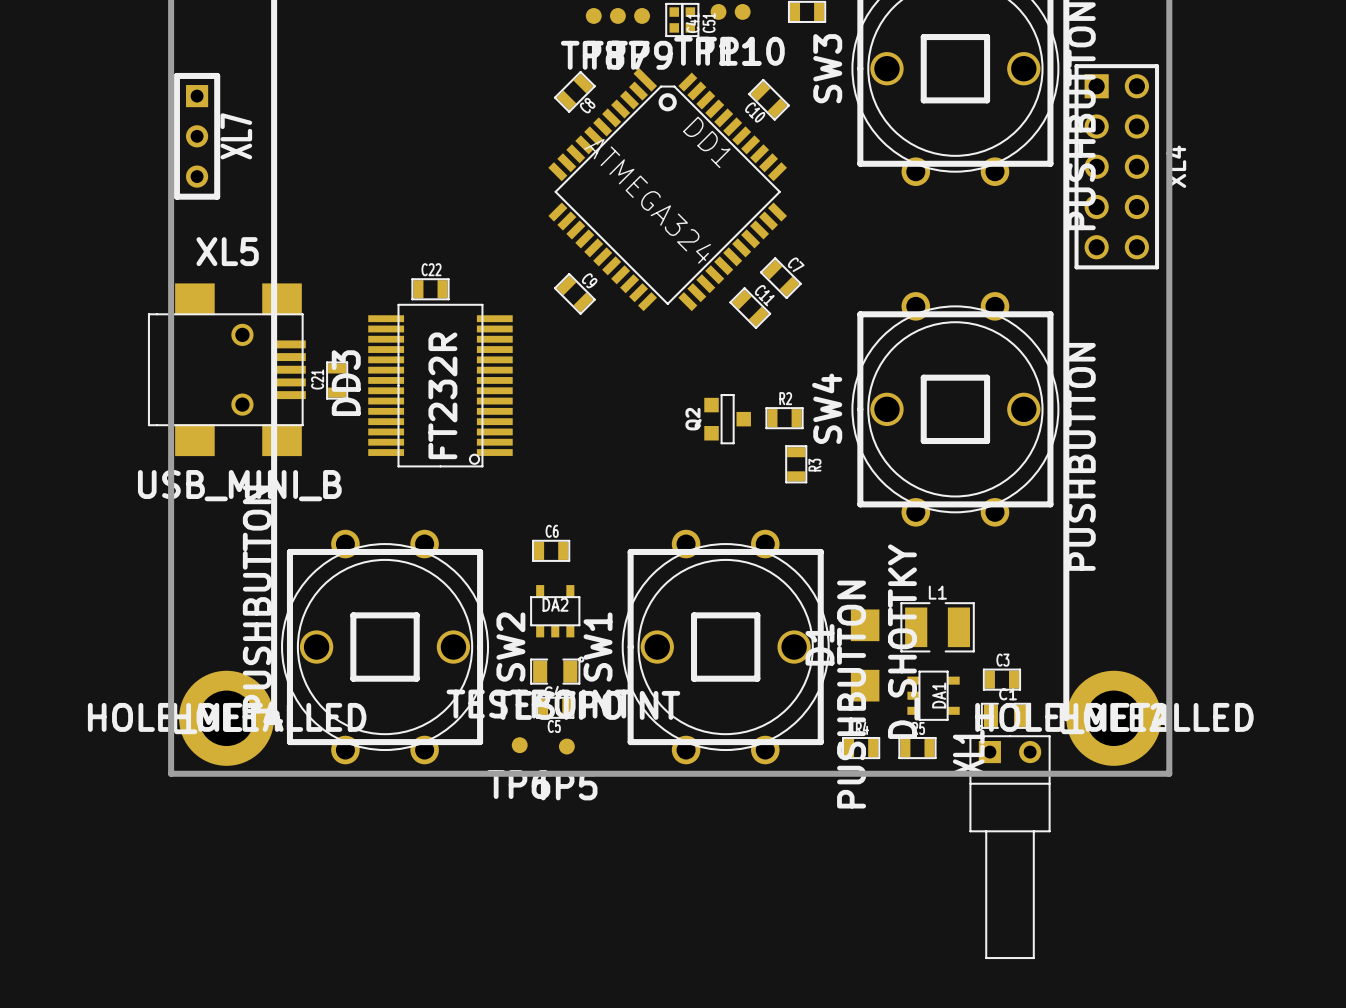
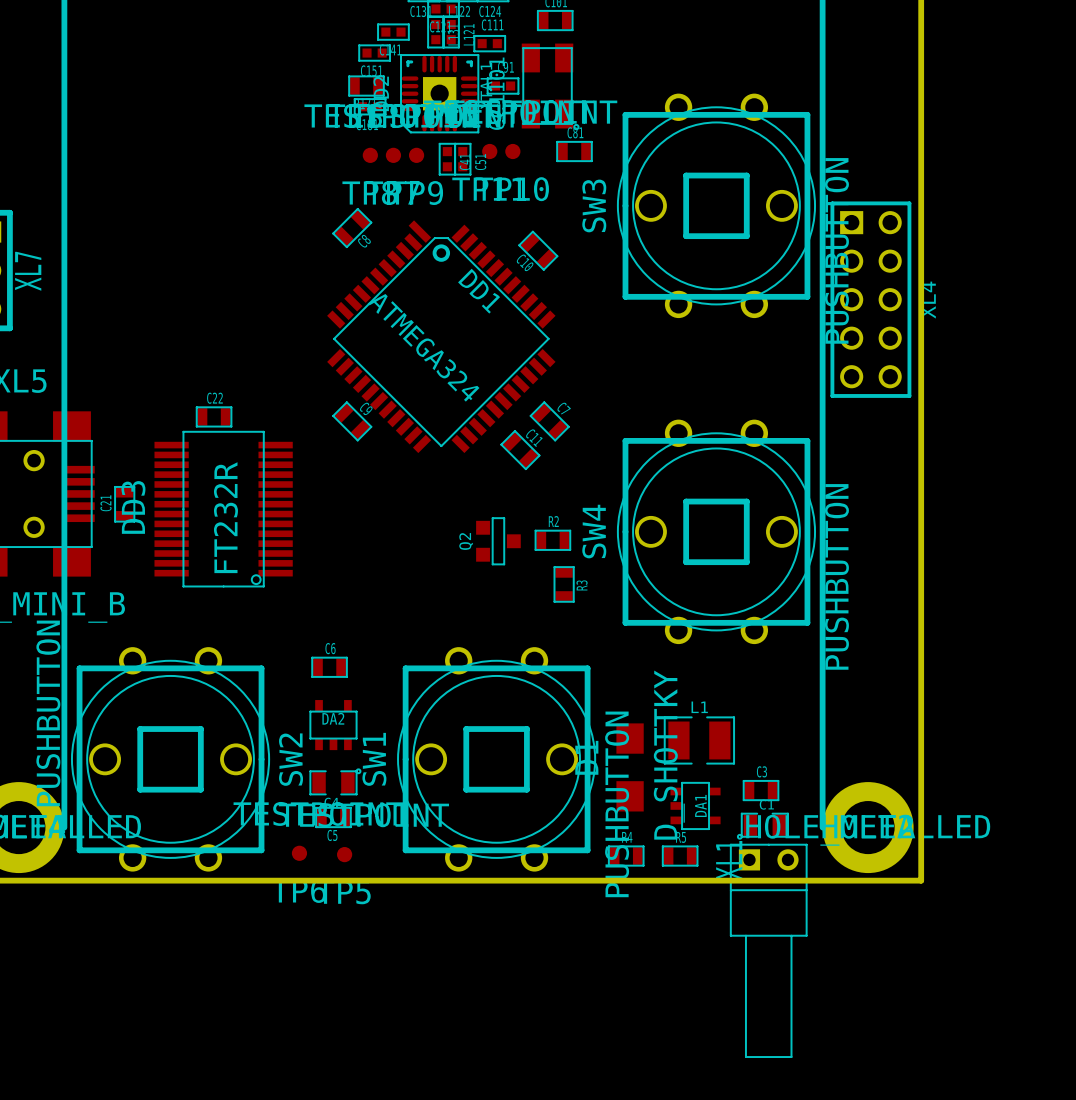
C10 position: (768, 99) -> (538, 250)
DD1 position: (667, 189) -> (441, 336)
C7 position: (780, 278) -> (549, 421)
C11 position: (750, 308) -> (520, 450)

